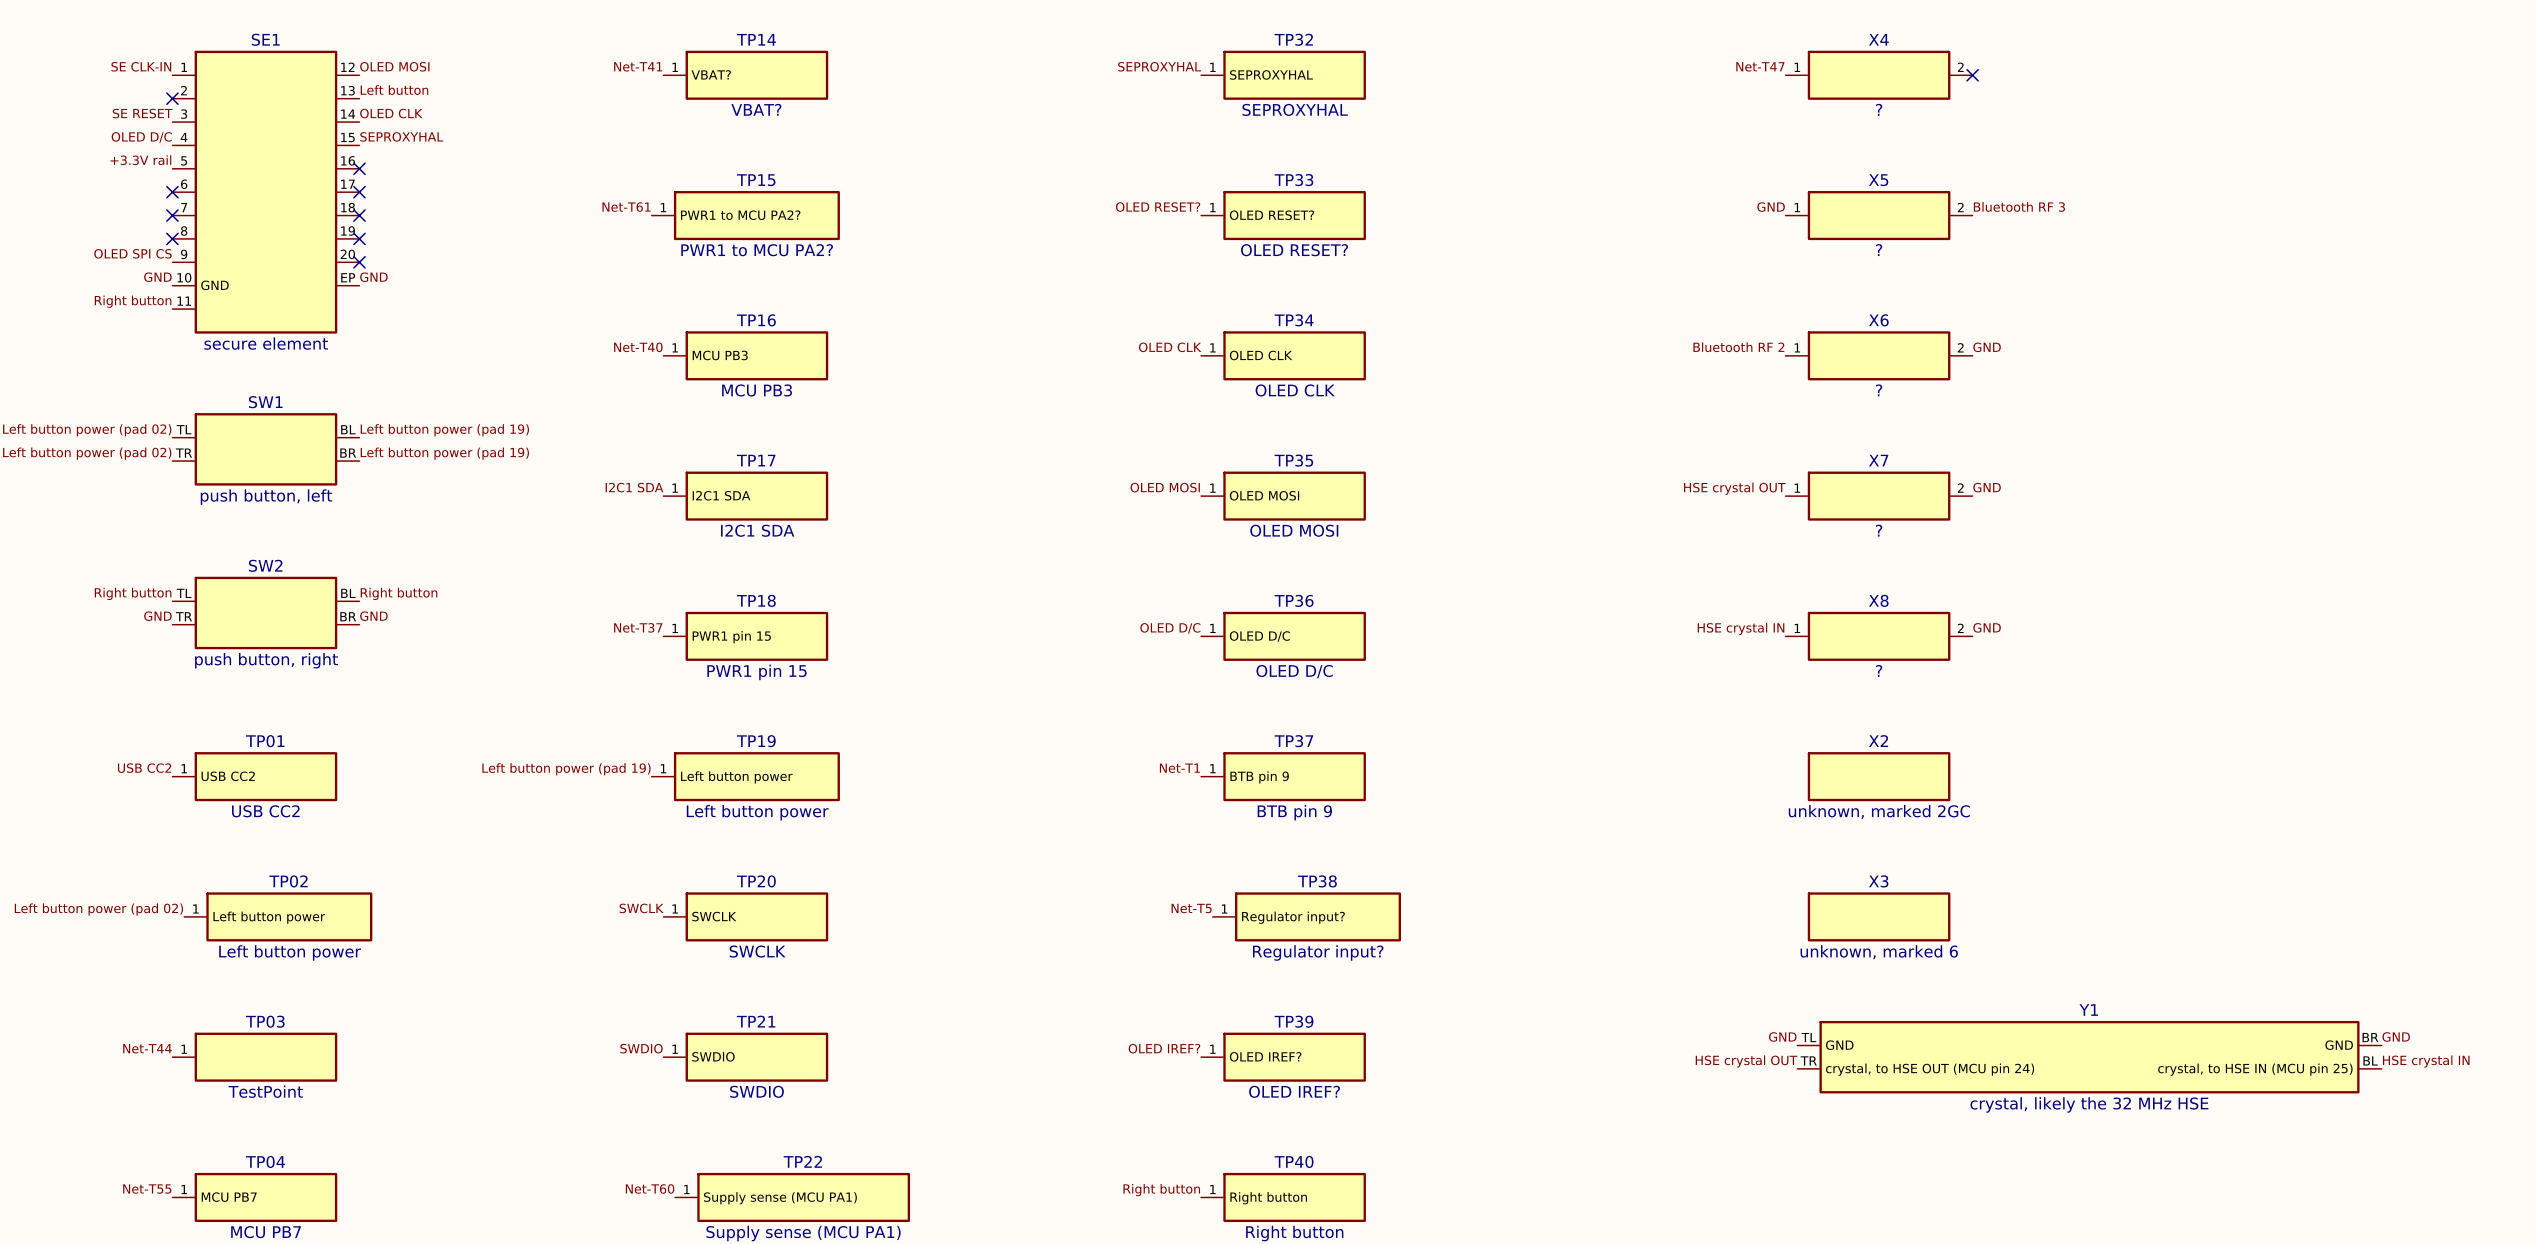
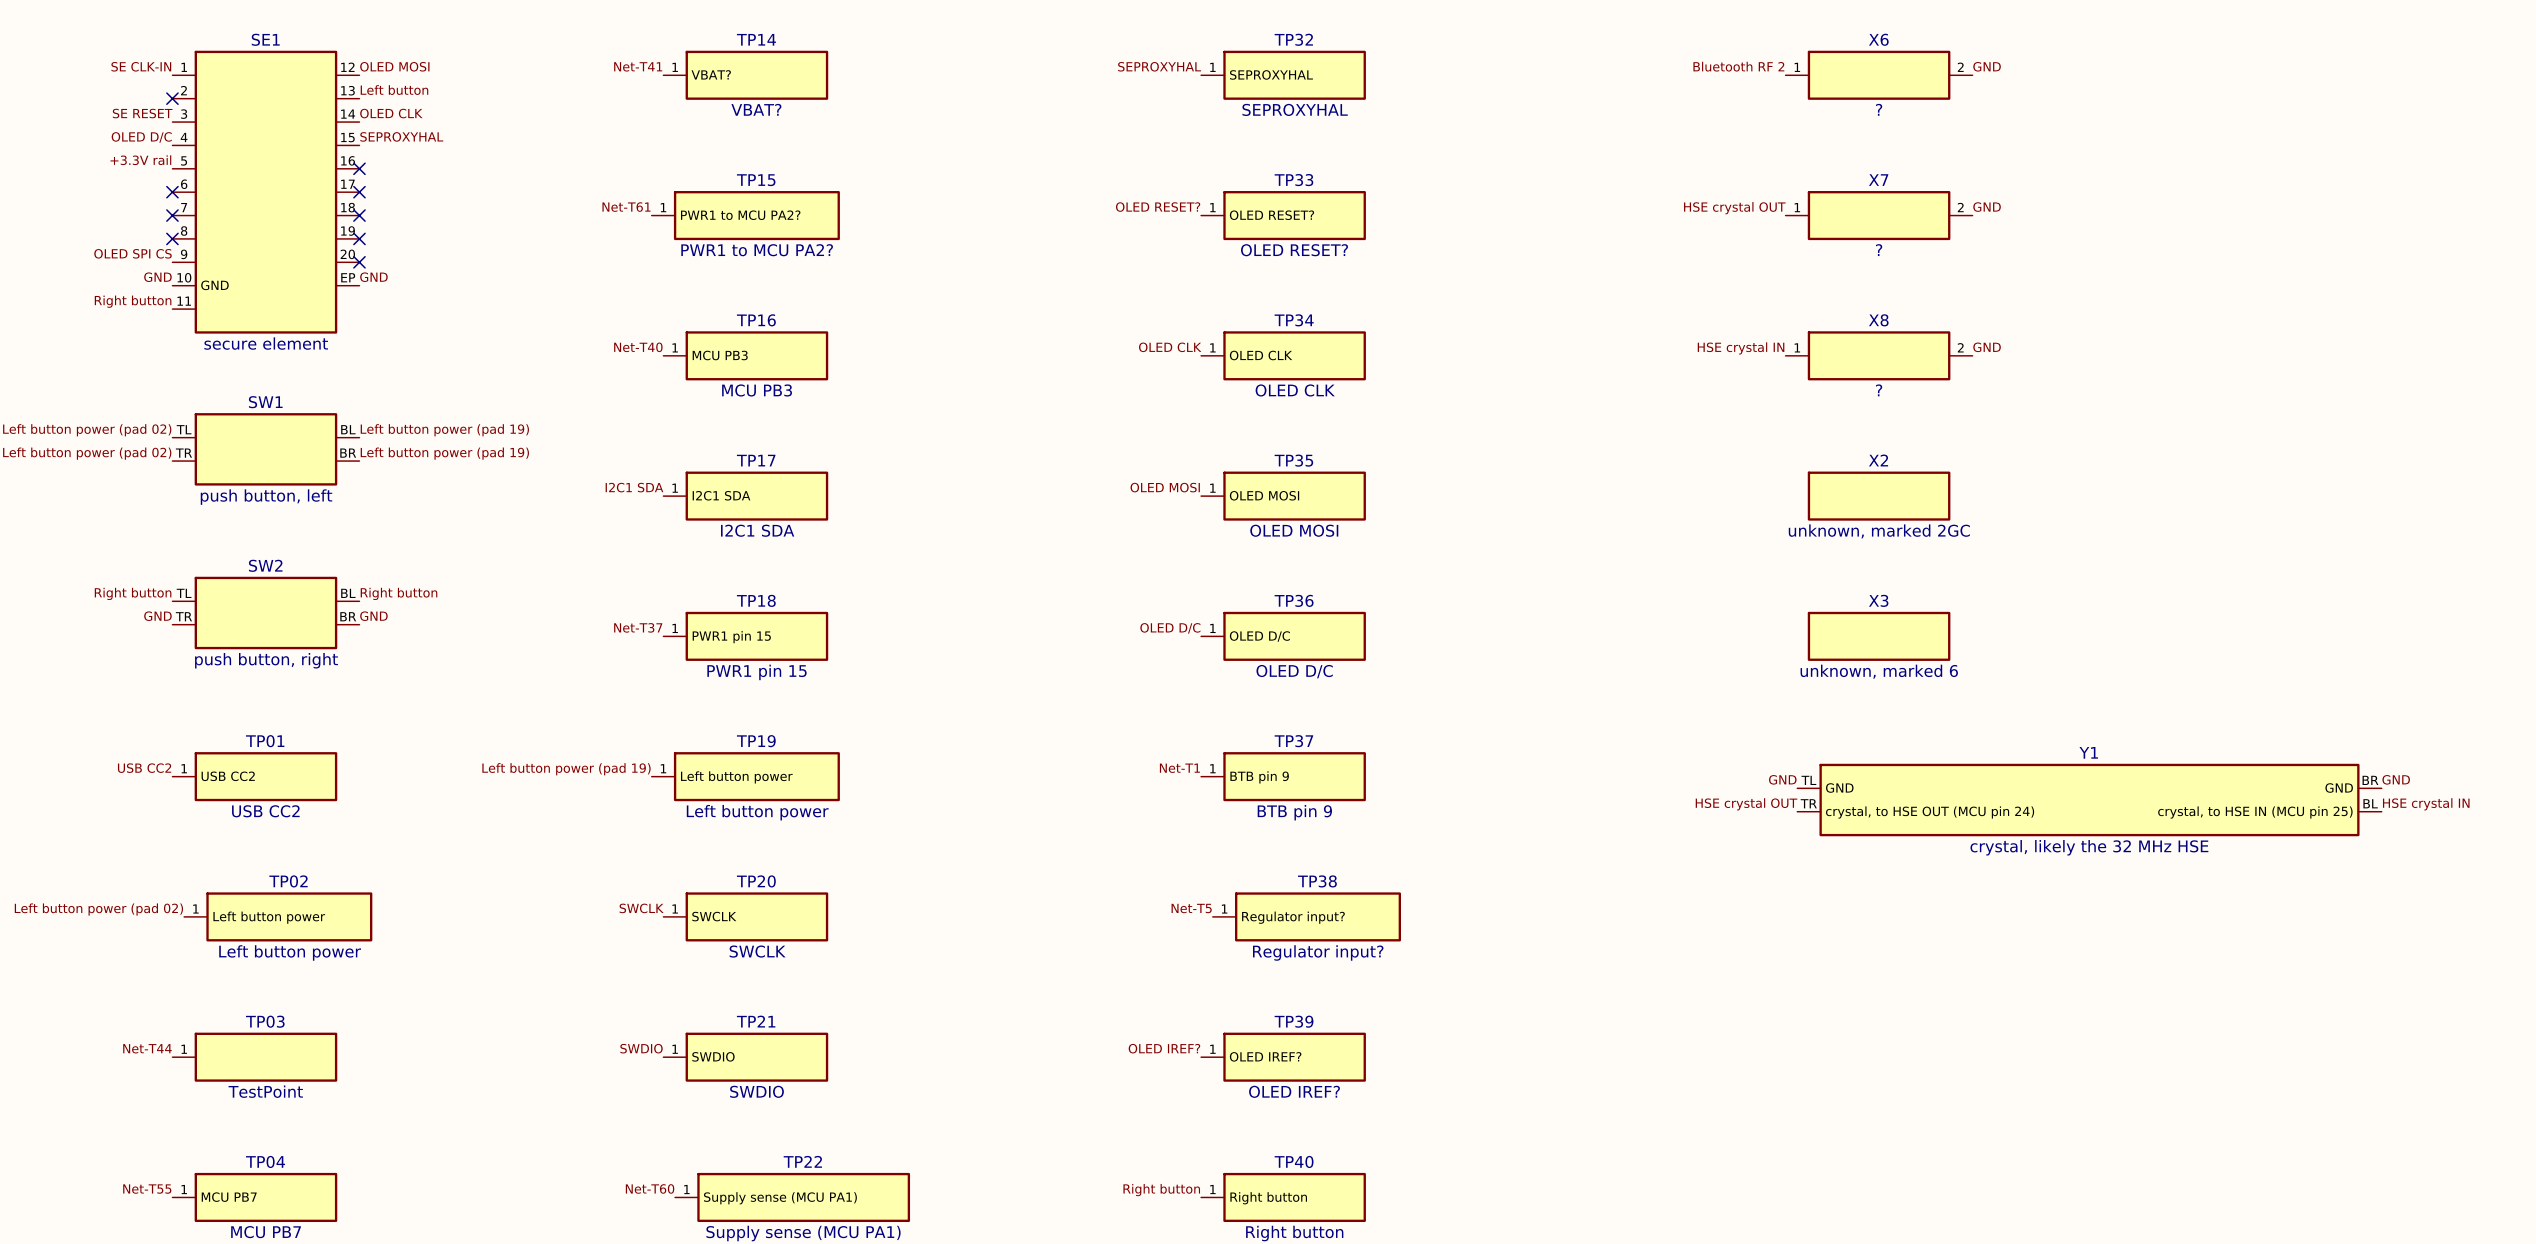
X4 name: X4 (1878, 39) -> X6 (1878, 39)
label: Net-T47 (1760, 66) -> Bluetooth RF 2 (1738, 66)
label: none -> GND (1987, 66)
no-connect mark: (1972, 75) -> none
X5 name: X5 (1878, 180) -> X7 (1878, 180)
label: Bluetooth RF 3 (2019, 206) -> GND (1987, 207)
label: GND (1771, 207) -> HSE crystal OUT (1734, 208)
X6 name: X6 (1878, 320) -> X8 (1878, 320)
label: Bluetooth RF 2 (1738, 347) -> HSE crystal IN (1741, 348)
label: GND (1987, 487) -> none
label: HSE crystal OUT (1734, 488) -> none
X7: ? (1879, 496) -> none
label: GND (1987, 627) -> none
label: HSE crystal IN (1741, 628) -> none
X8: ? (1879, 636) -> none
X2 position: (1879, 776) -> (1879, 496)
label: none -> GND (1782, 779)
label: none -> GND (2396, 779)
label: none -> HSE crystal OUT (1746, 804)
label: none -> HSE crystal IN (2426, 804)
X3 position: (1879, 916) -> (1879, 636)
label: GND (1782, 1037) -> none
label: GND (2396, 1037) -> none
Y1 position: (2089, 1057) -> (2089, 800)
label: HSE crystal OUT (1746, 1061) -> none
label: HSE crystal IN (2426, 1061) -> none

